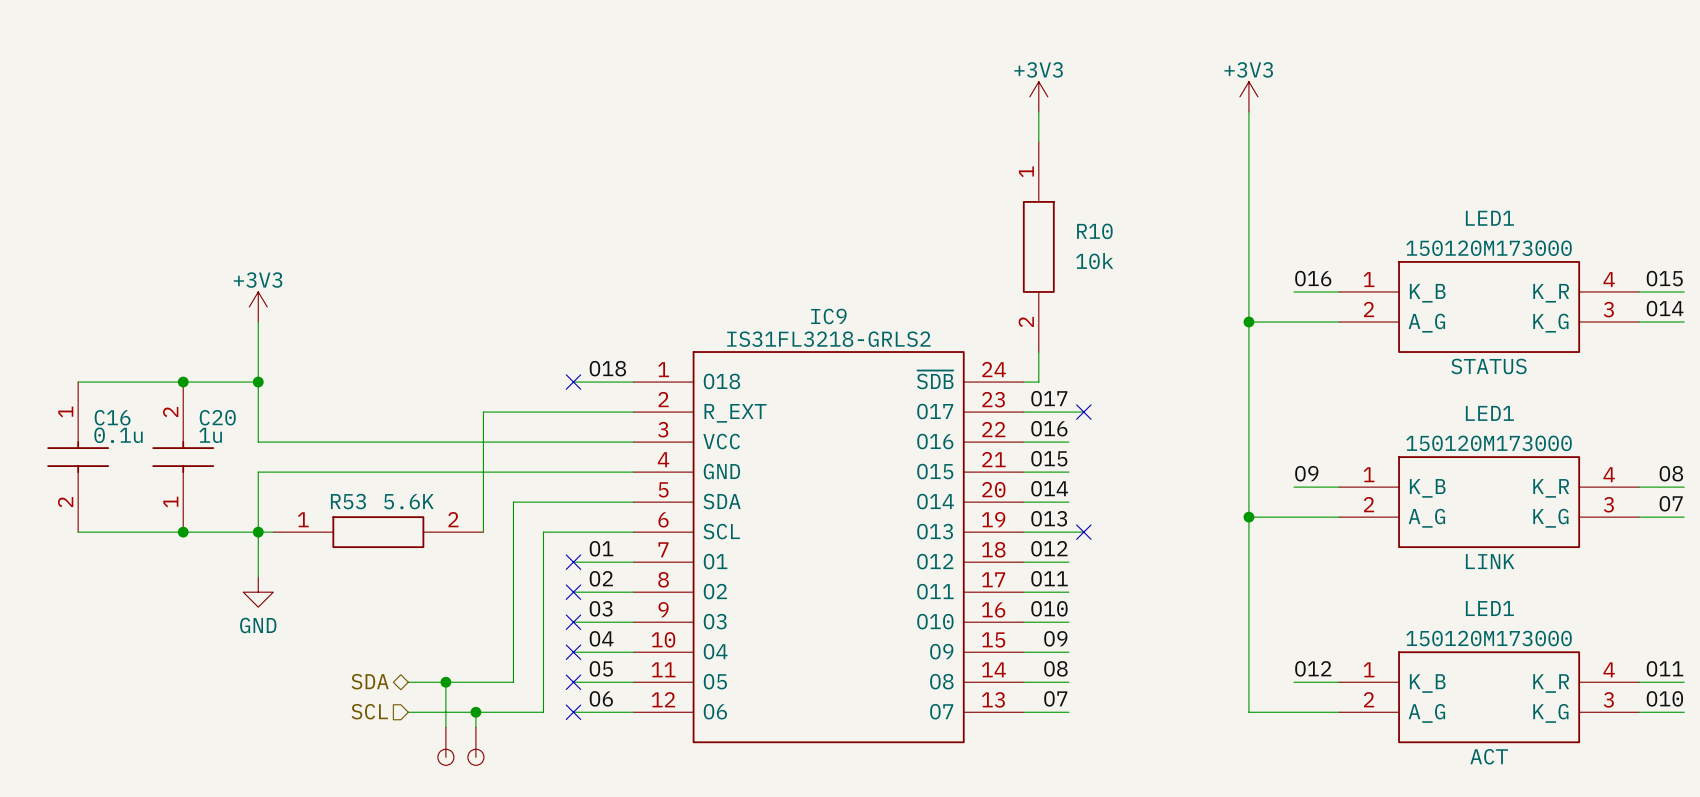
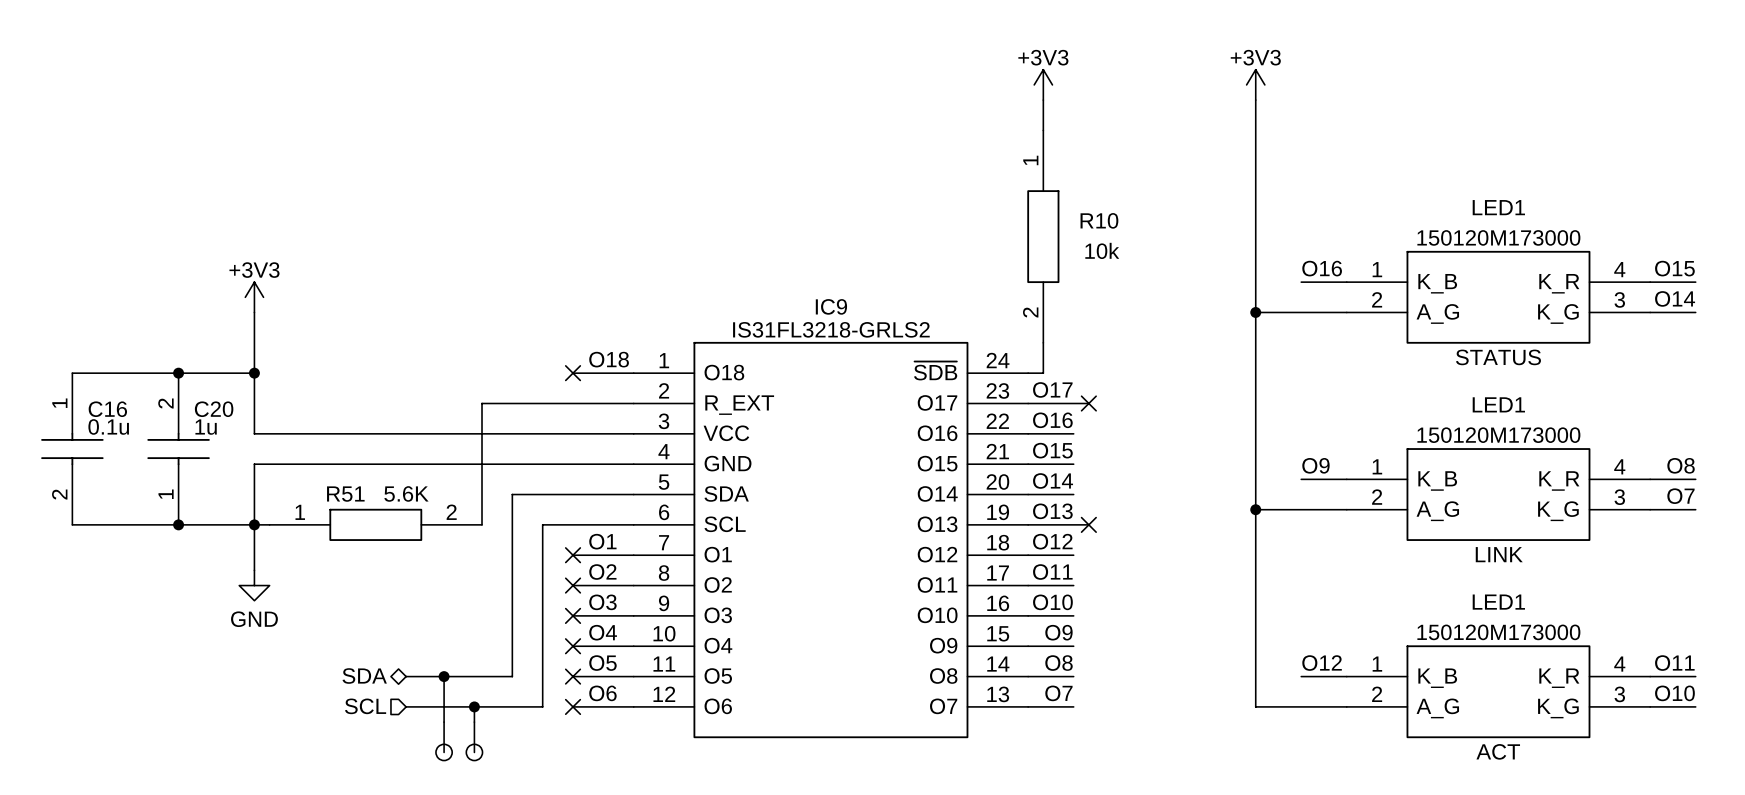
R53 name: R53 (348, 501) -> R51 (345, 494)

